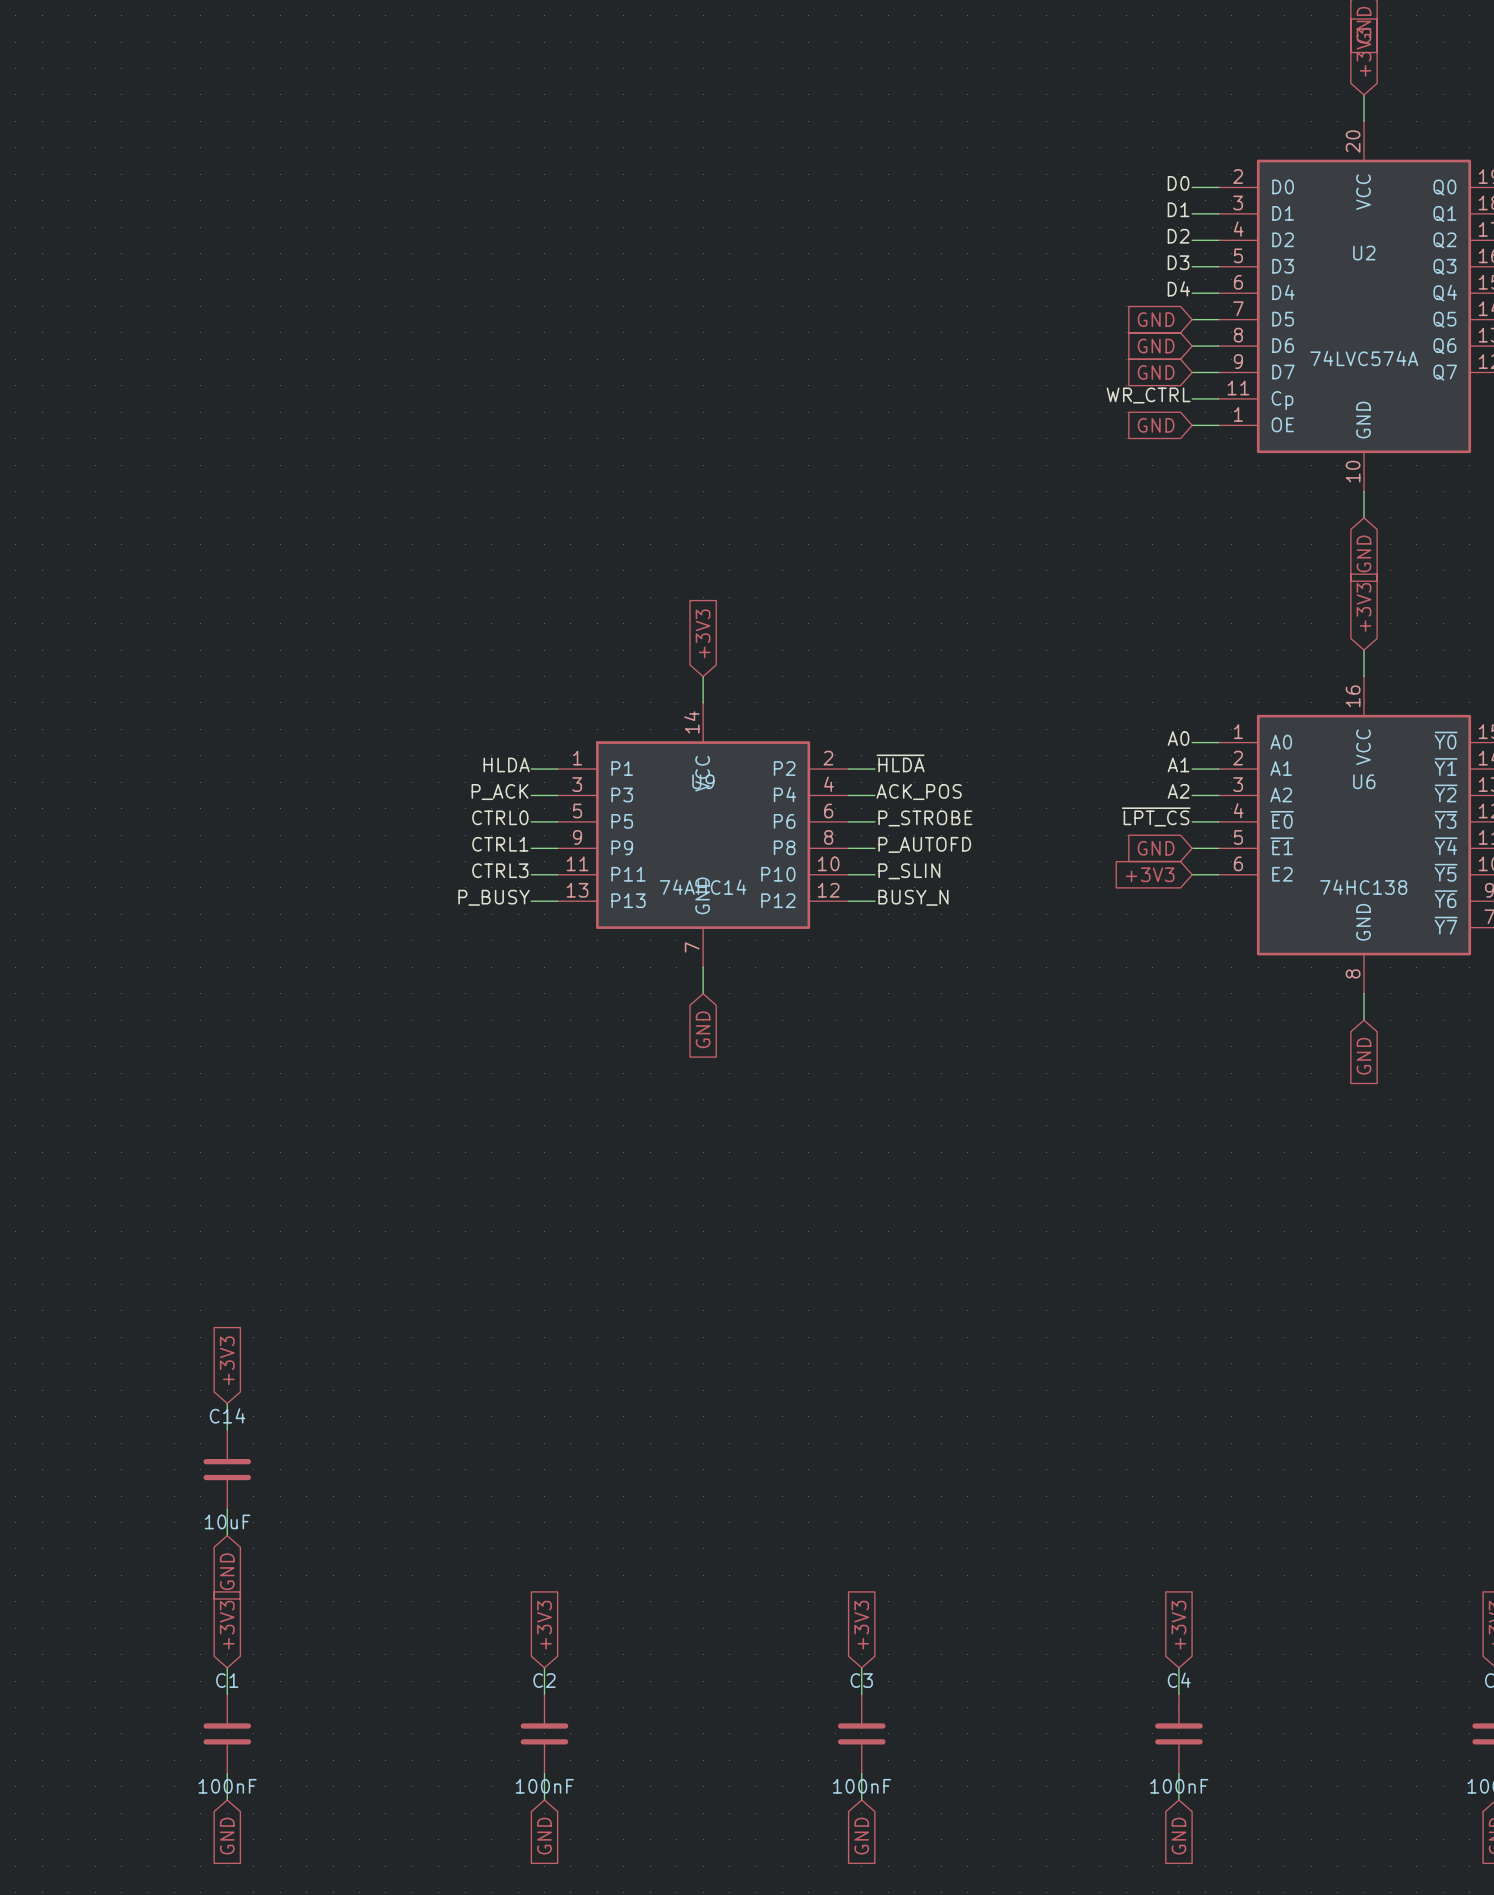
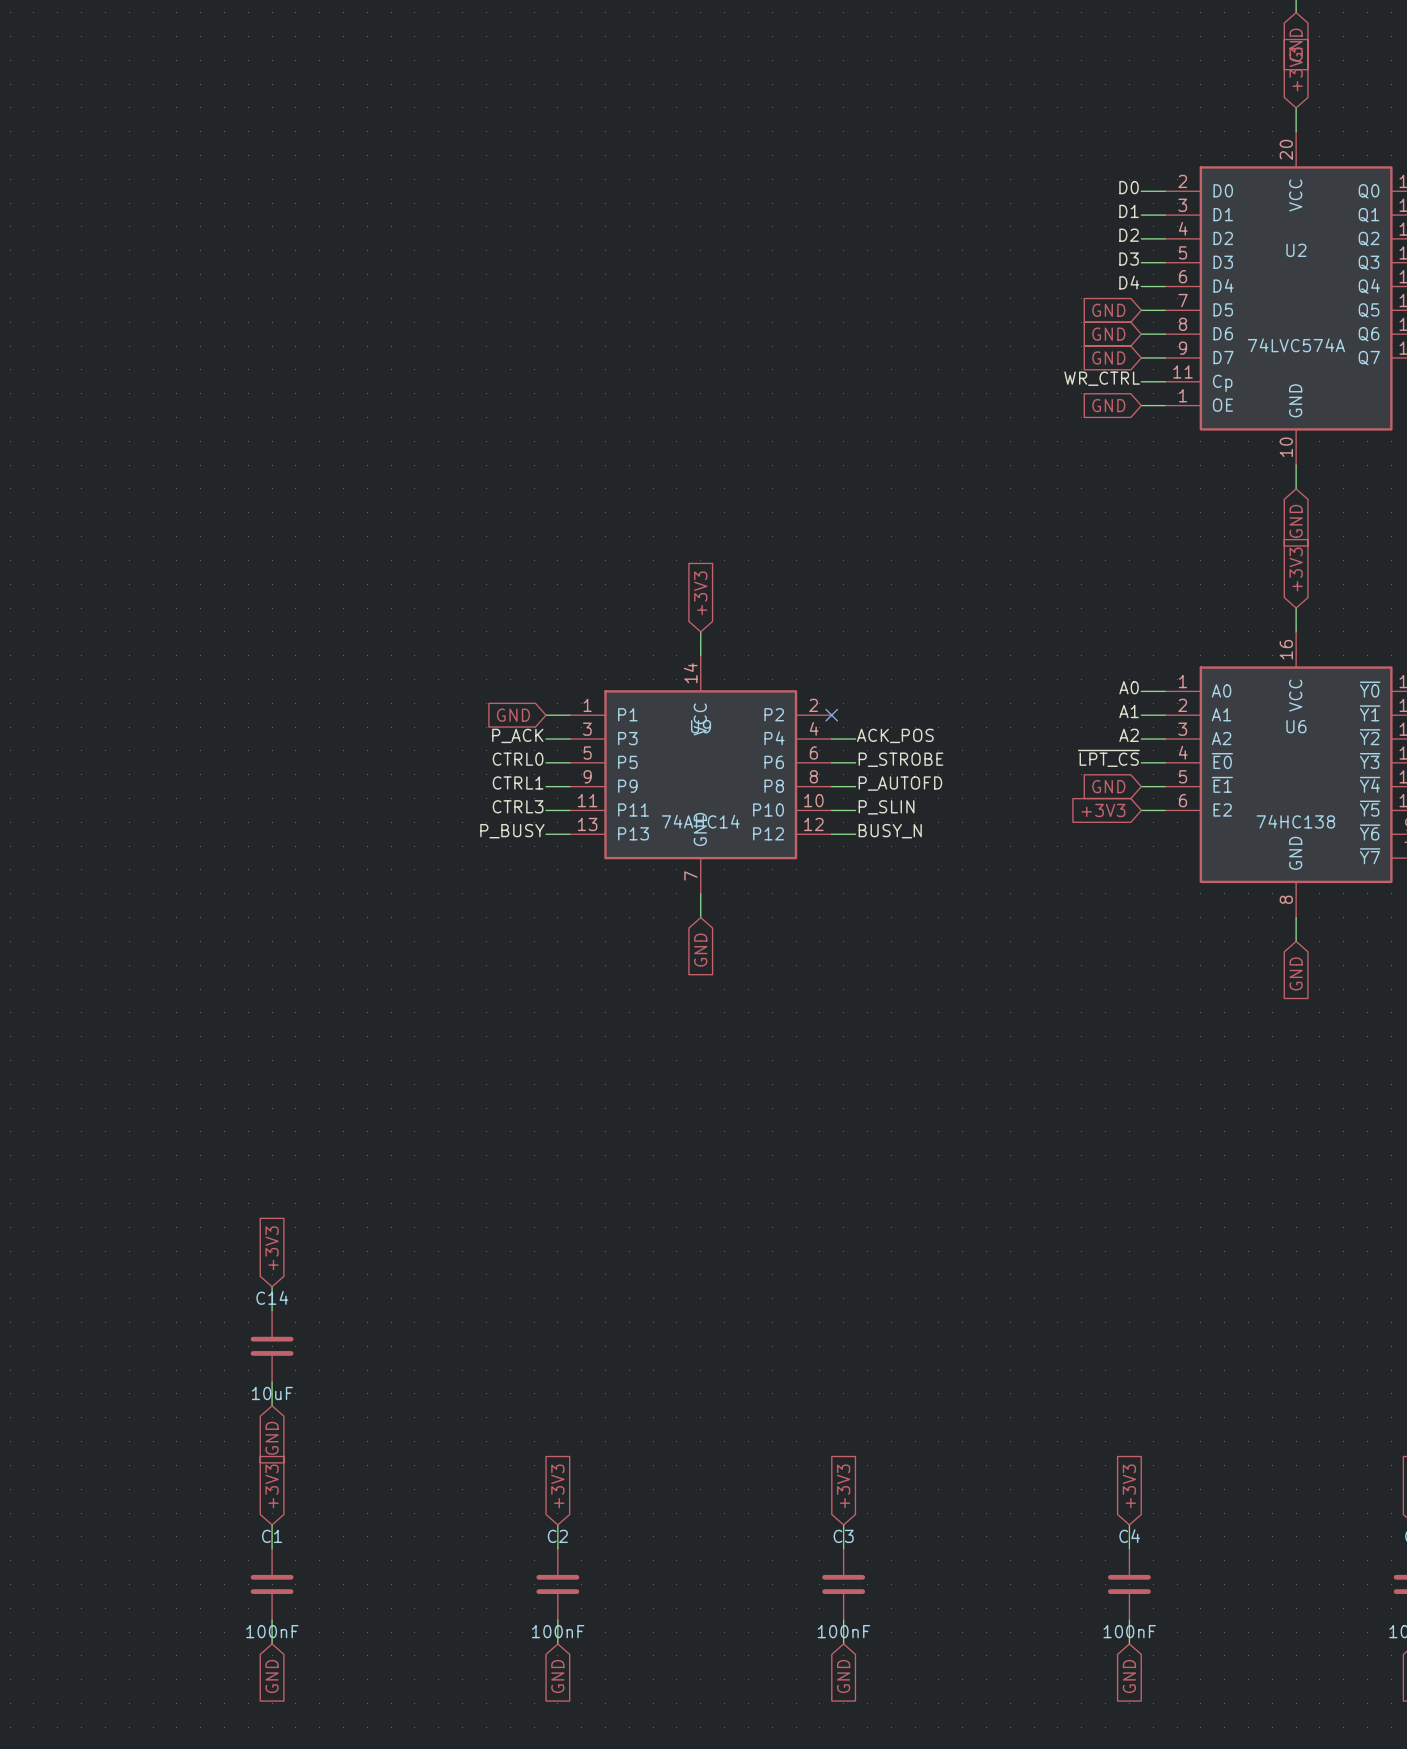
label: ~{HLDA} (900, 763) -> none
label: HLDA (506, 764) -> none
global label: none -> GND (513, 715)
wire: (848, 769) (874, 769) -> none
no-connect mark: none -> (831, 715)

